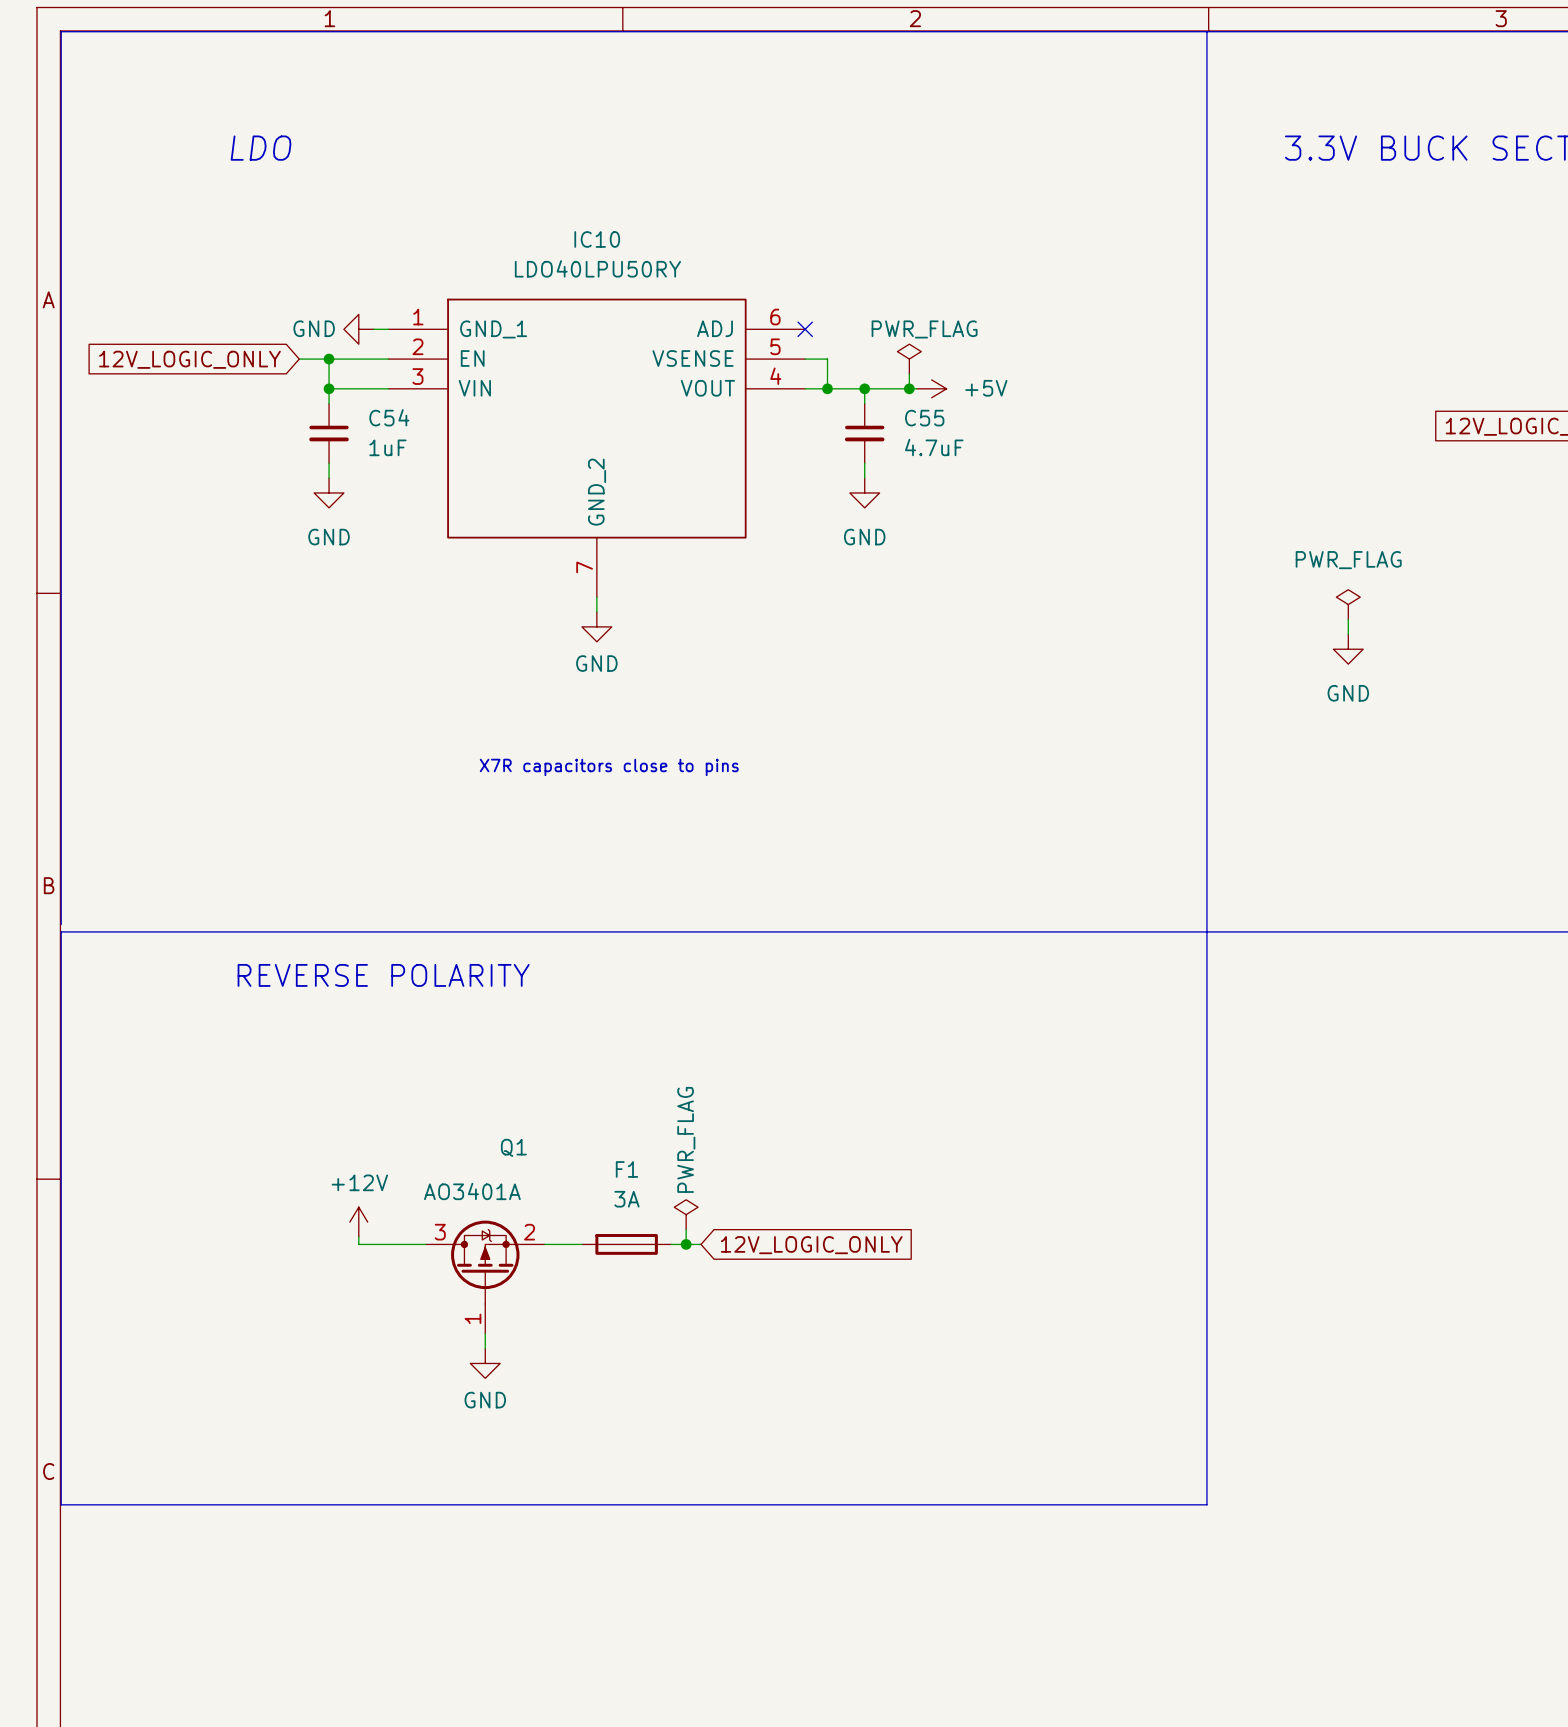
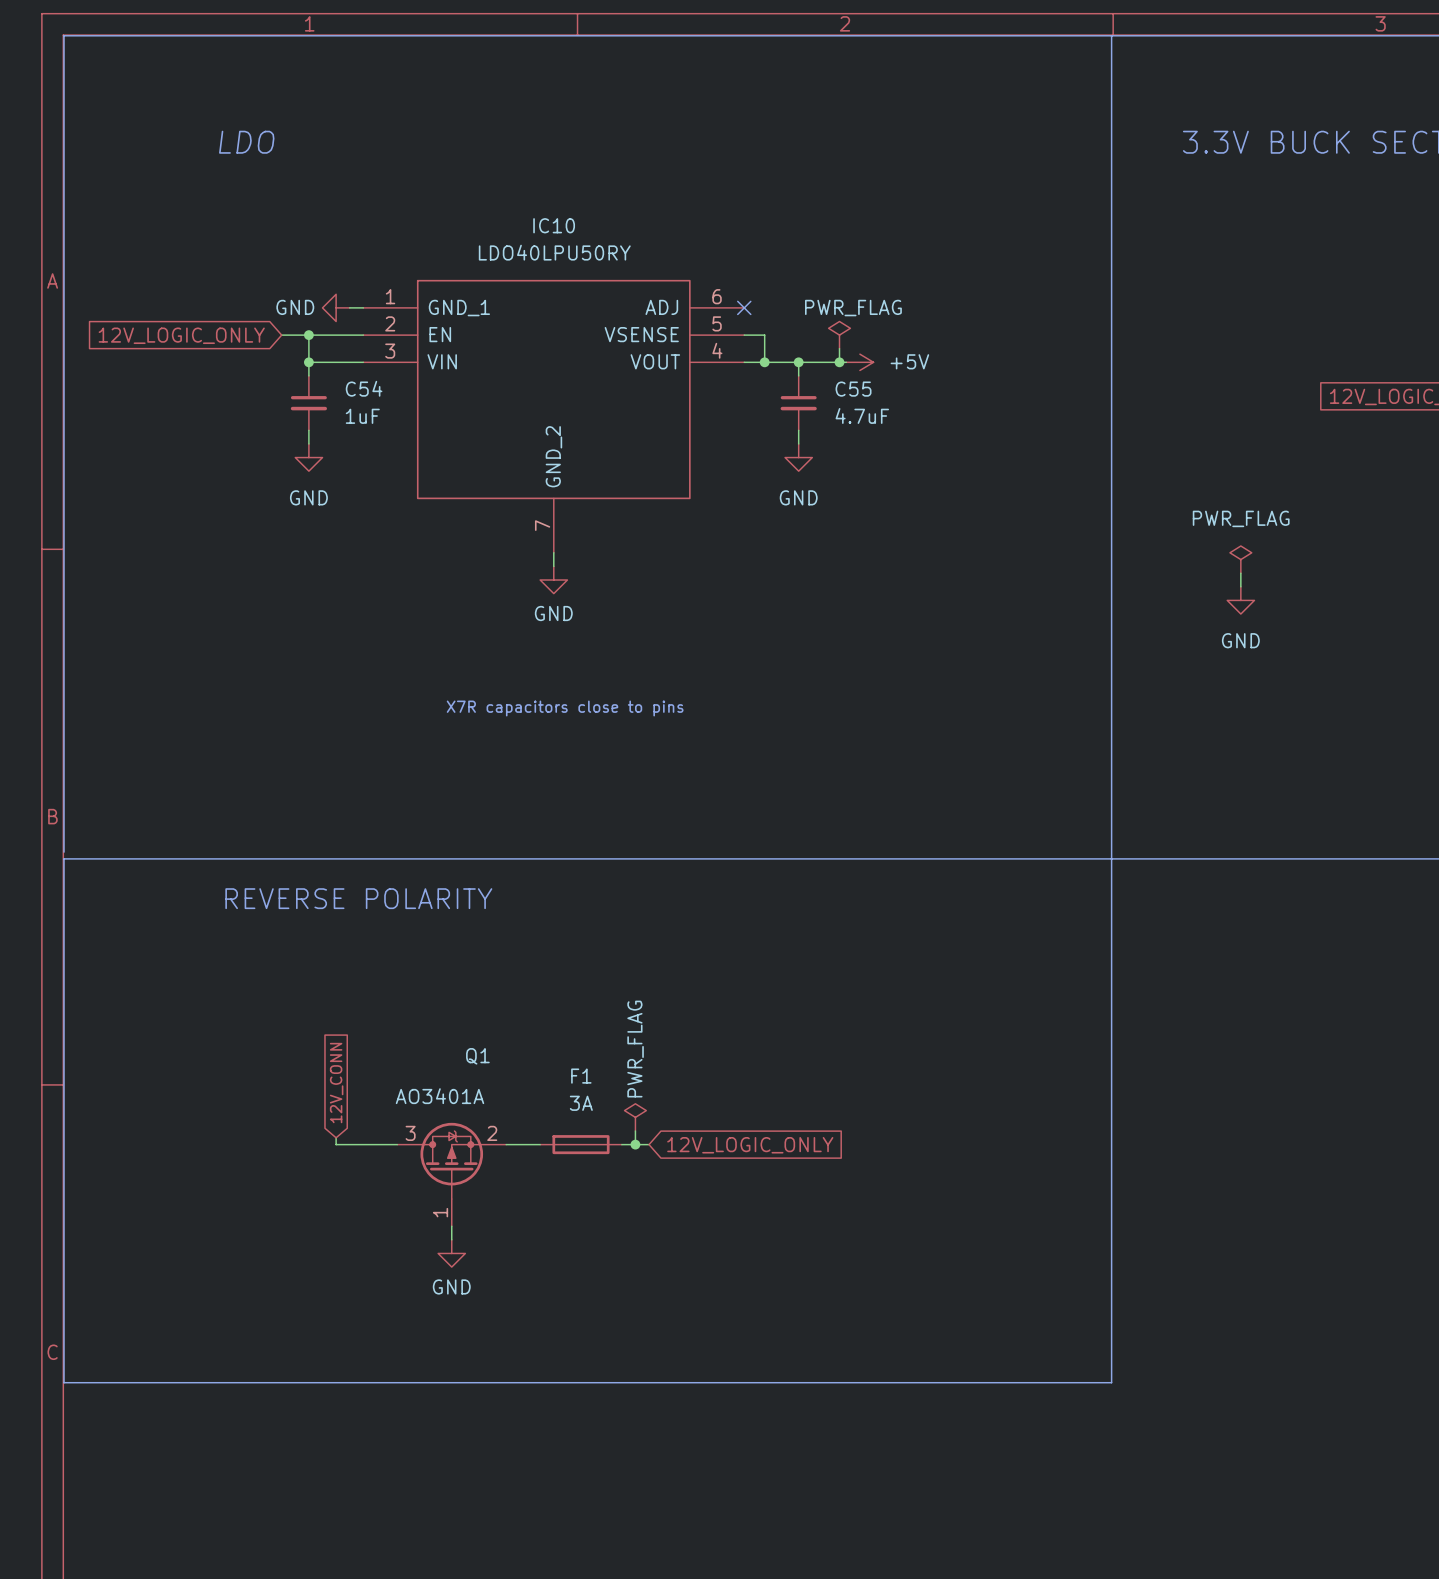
global label: none -> 12V_CONN (336, 1083)
power symbol: +12V (358, 1222) -> none

